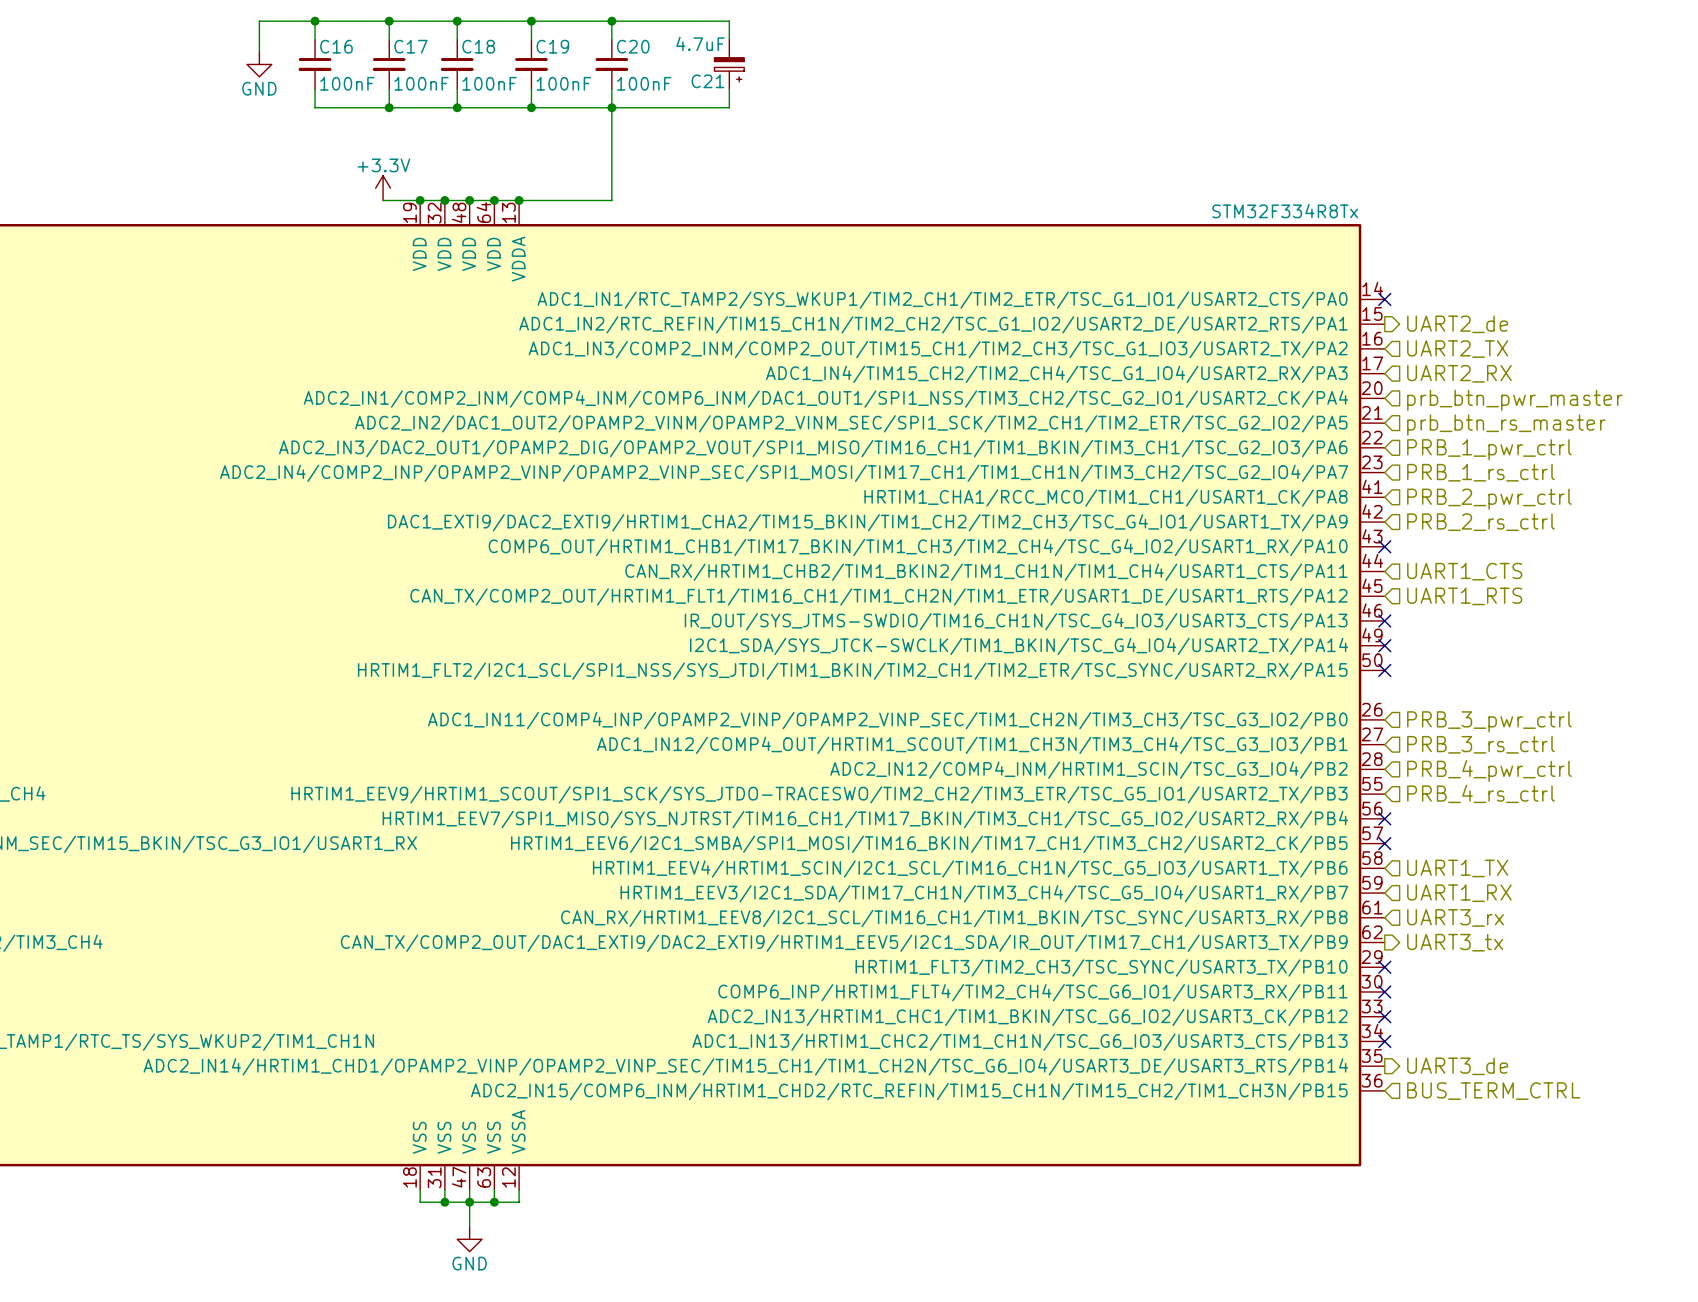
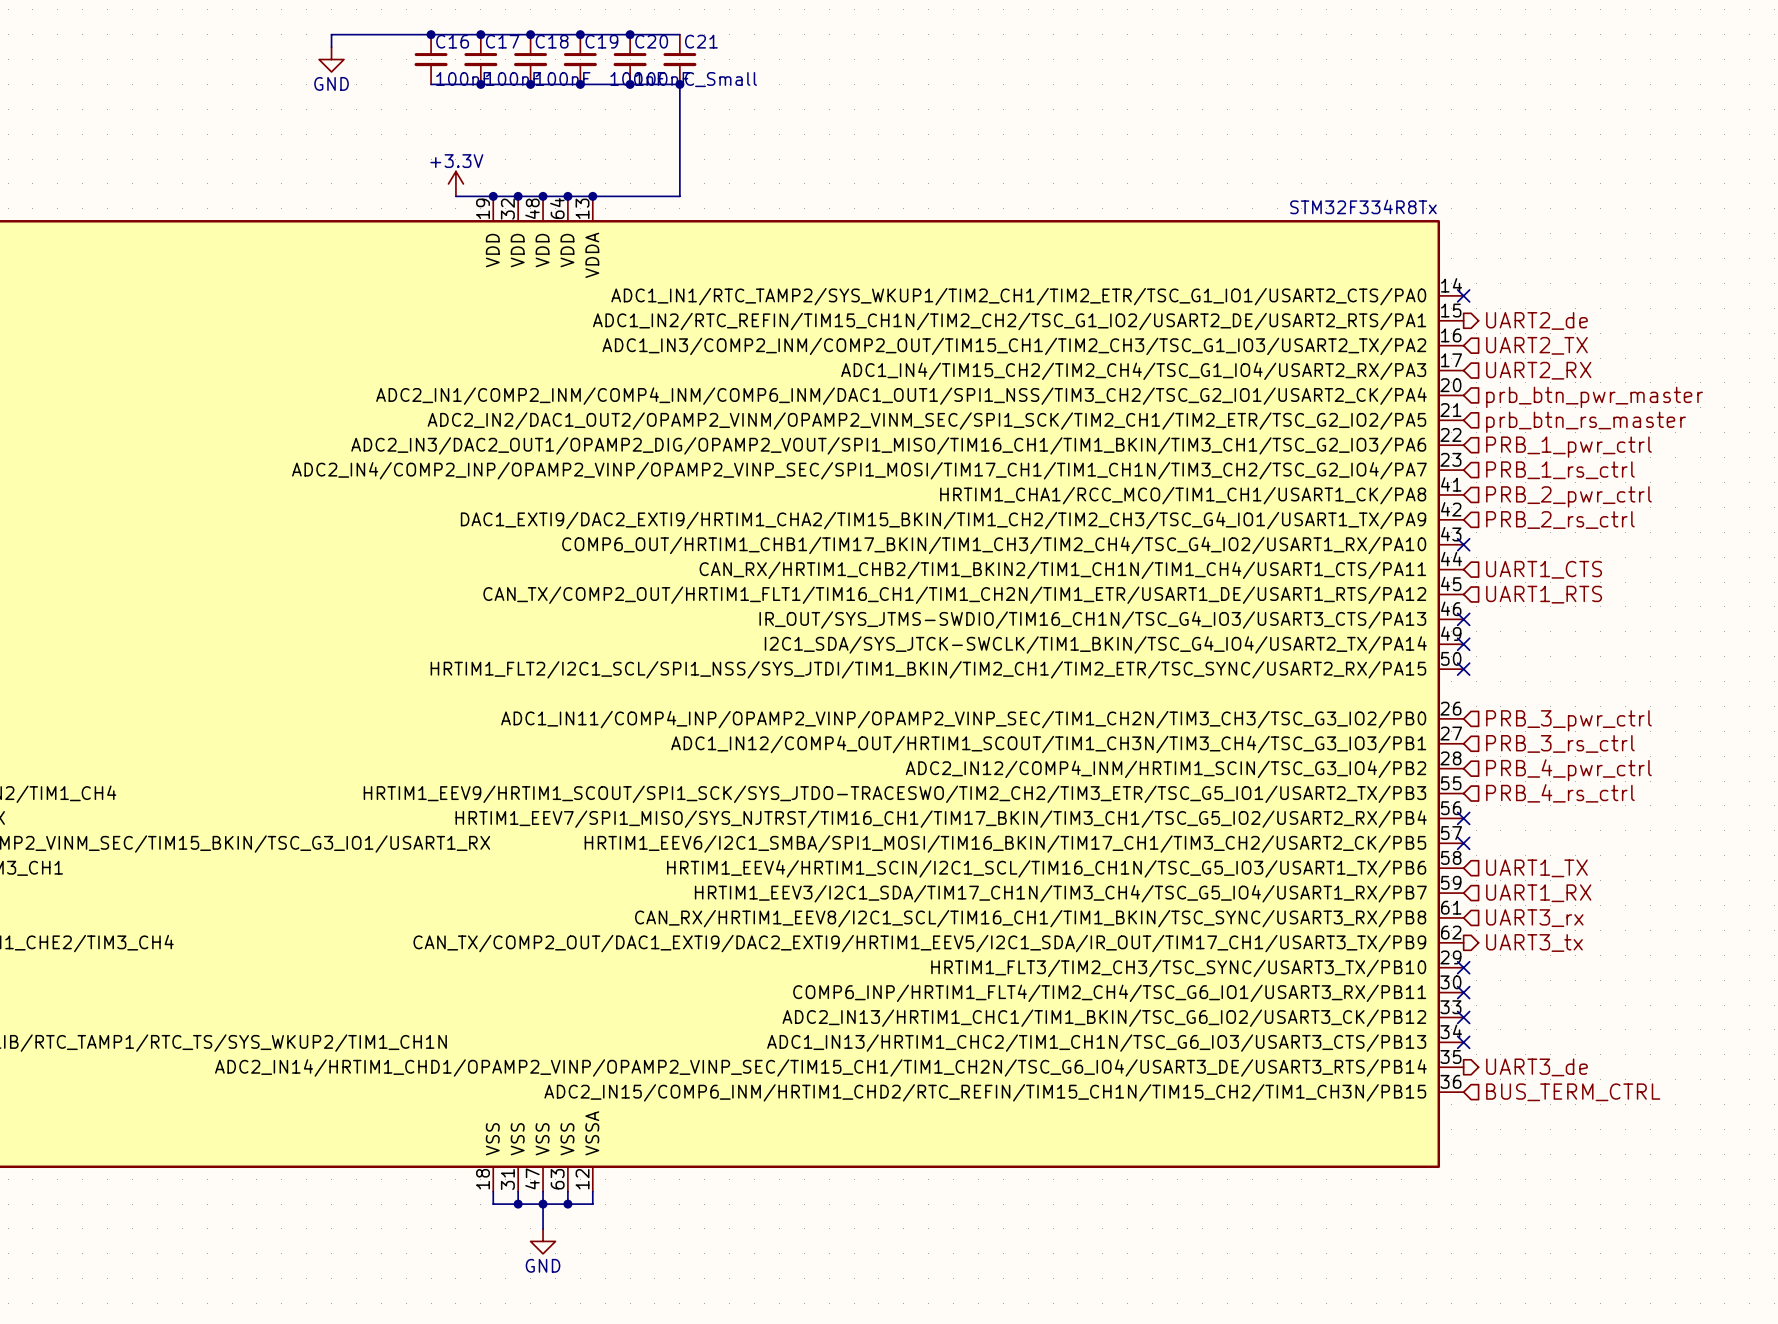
wire: (315, 21) (315, 39) -> none
junction: (315, 21) -> none
wire: (389, 21) (389, 39) -> none
junction: (389, 21) -> none
wire: (457, 21) (457, 39) -> none
junction position: (457, 21) -> (530, 34)
wire: (531, 21) (531, 39) -> none
junction: (531, 21) -> none
wire: (611, 21) (611, 39) -> none
junction: (611, 21) -> none
wire: (259, 39) (259, 21) (729, 21) (729, 39) -> (331, 34) (679, 34)
junction: none -> (431, 34)
junction: none -> (480, 34)
junction: none -> (580, 34)
junction: none -> (630, 34)
C21 symbol: [714, 39, 745, 90] -> [663, 34, 697, 85]
C21 value: 4.7uF (700, 43) -> C_Small (720, 79)
C16 position: (315, 64) -> (431, 59)
C17 position: (389, 64) -> (480, 59)
C19 position: (531, 64) -> (580, 59)
C20 position: (611, 64) -> (630, 59)
C21 name position: C21 (707, 81) -> C21 (701, 41)
wire: (315, 89) (315, 107) (729, 107) (729, 89) -> none
wire: (389, 89) (389, 107) -> none
wire: (457, 89) (457, 107) -> none
junction: none -> (580, 84)
wire: (531, 89) (531, 107) -> none
junction: none -> (630, 84)
wire: (611, 89) (611, 200) (605, 200) -> (431, 84) (679, 84) (679, 196)
junction position: (389, 107) -> (480, 84)
junction position: (457, 107) -> (530, 84)
junction: (531, 107) -> none
junction position: (611, 107) -> (679, 84)

